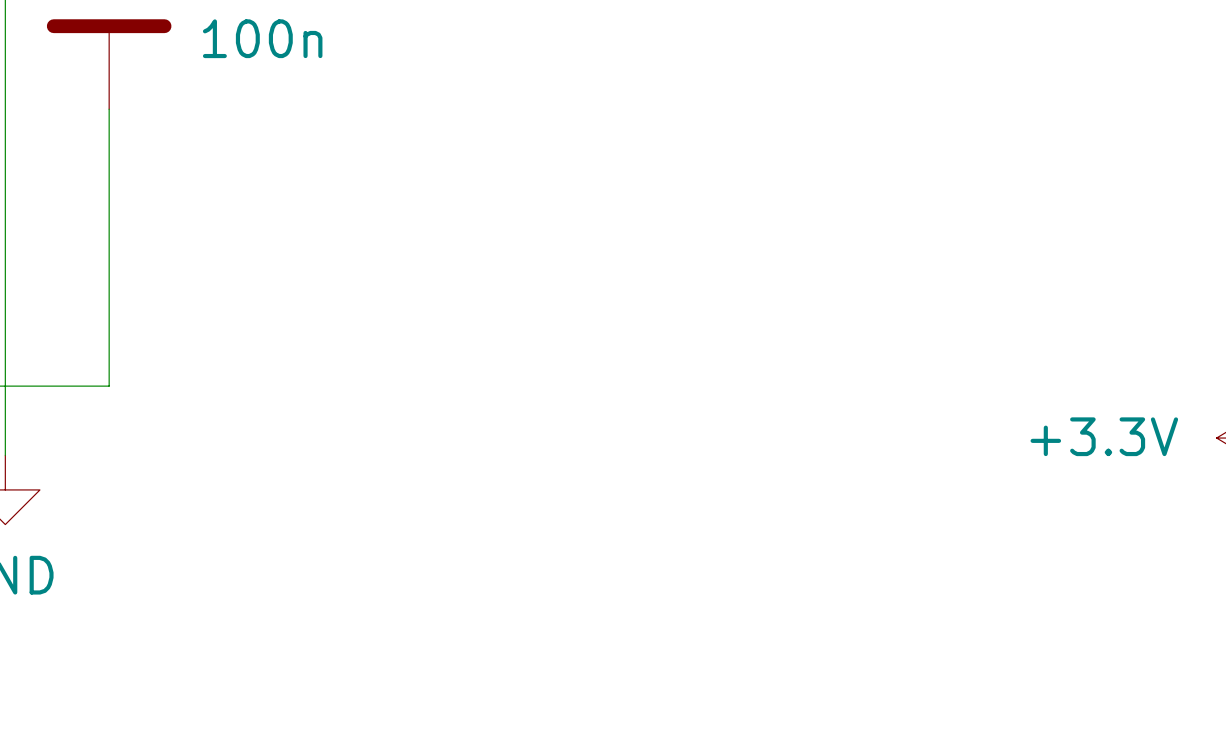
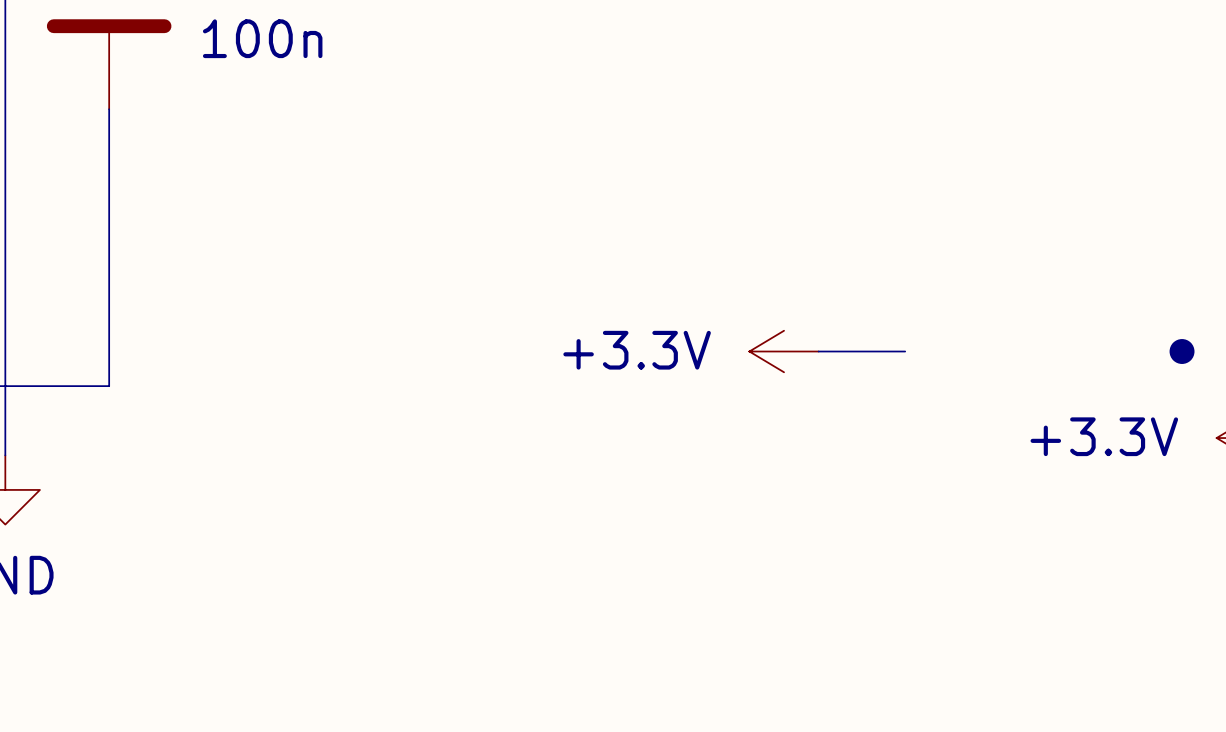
power symbol: none -> +3.3V (784, 351)
wire: none -> (818, 351) (905, 351)
junction: none -> (1182, 351)

